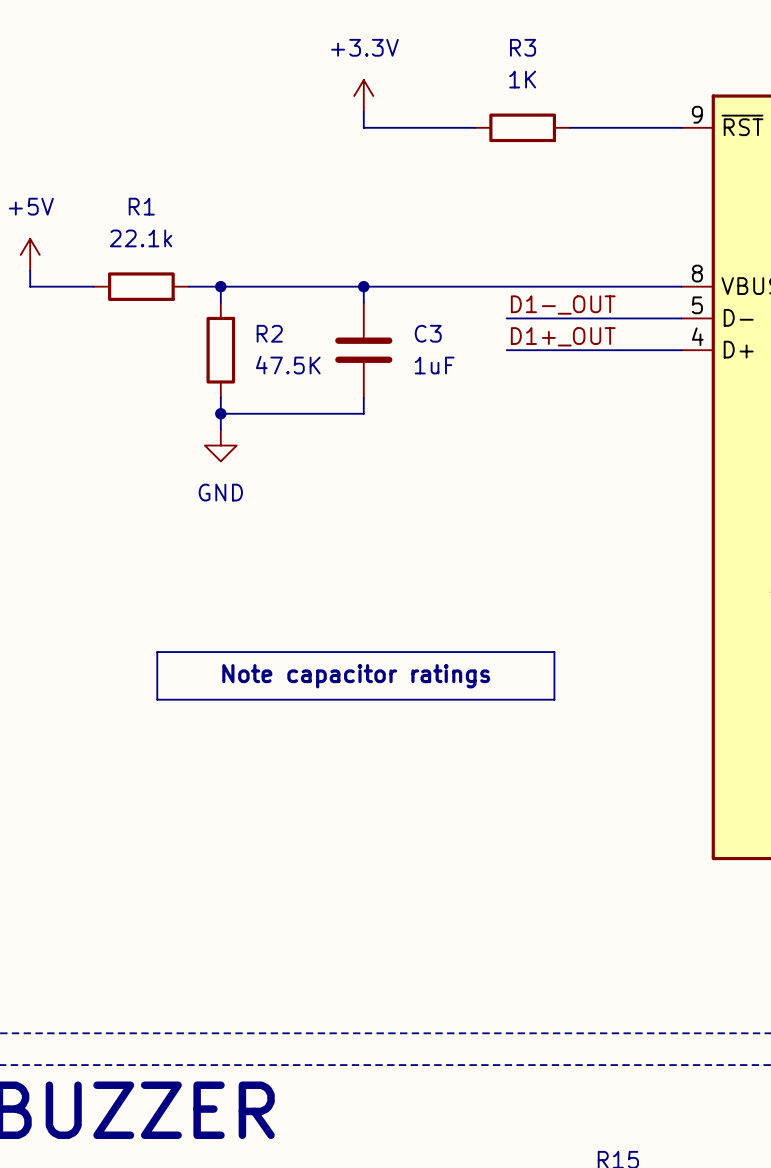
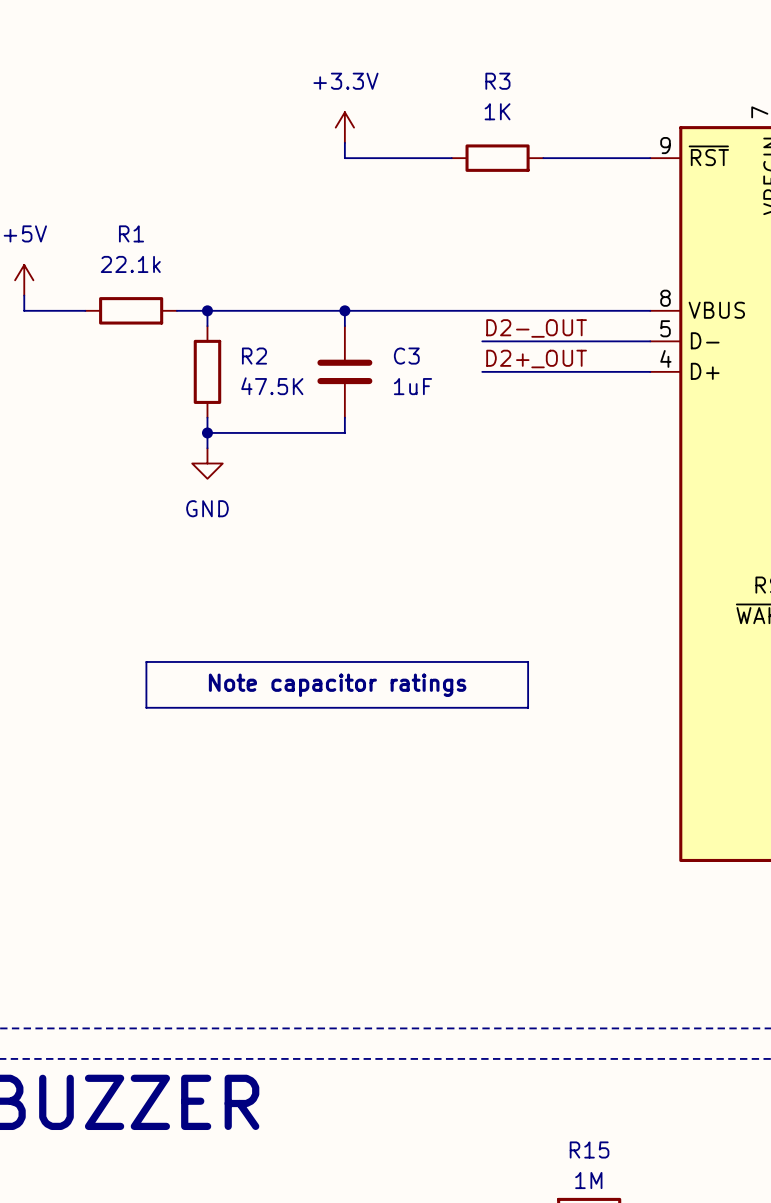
label: D1-_OUT (563, 305) -> D2-_OUT (536, 328)
label: D1+_OUT (563, 336) -> D2+_OUT (536, 359)

